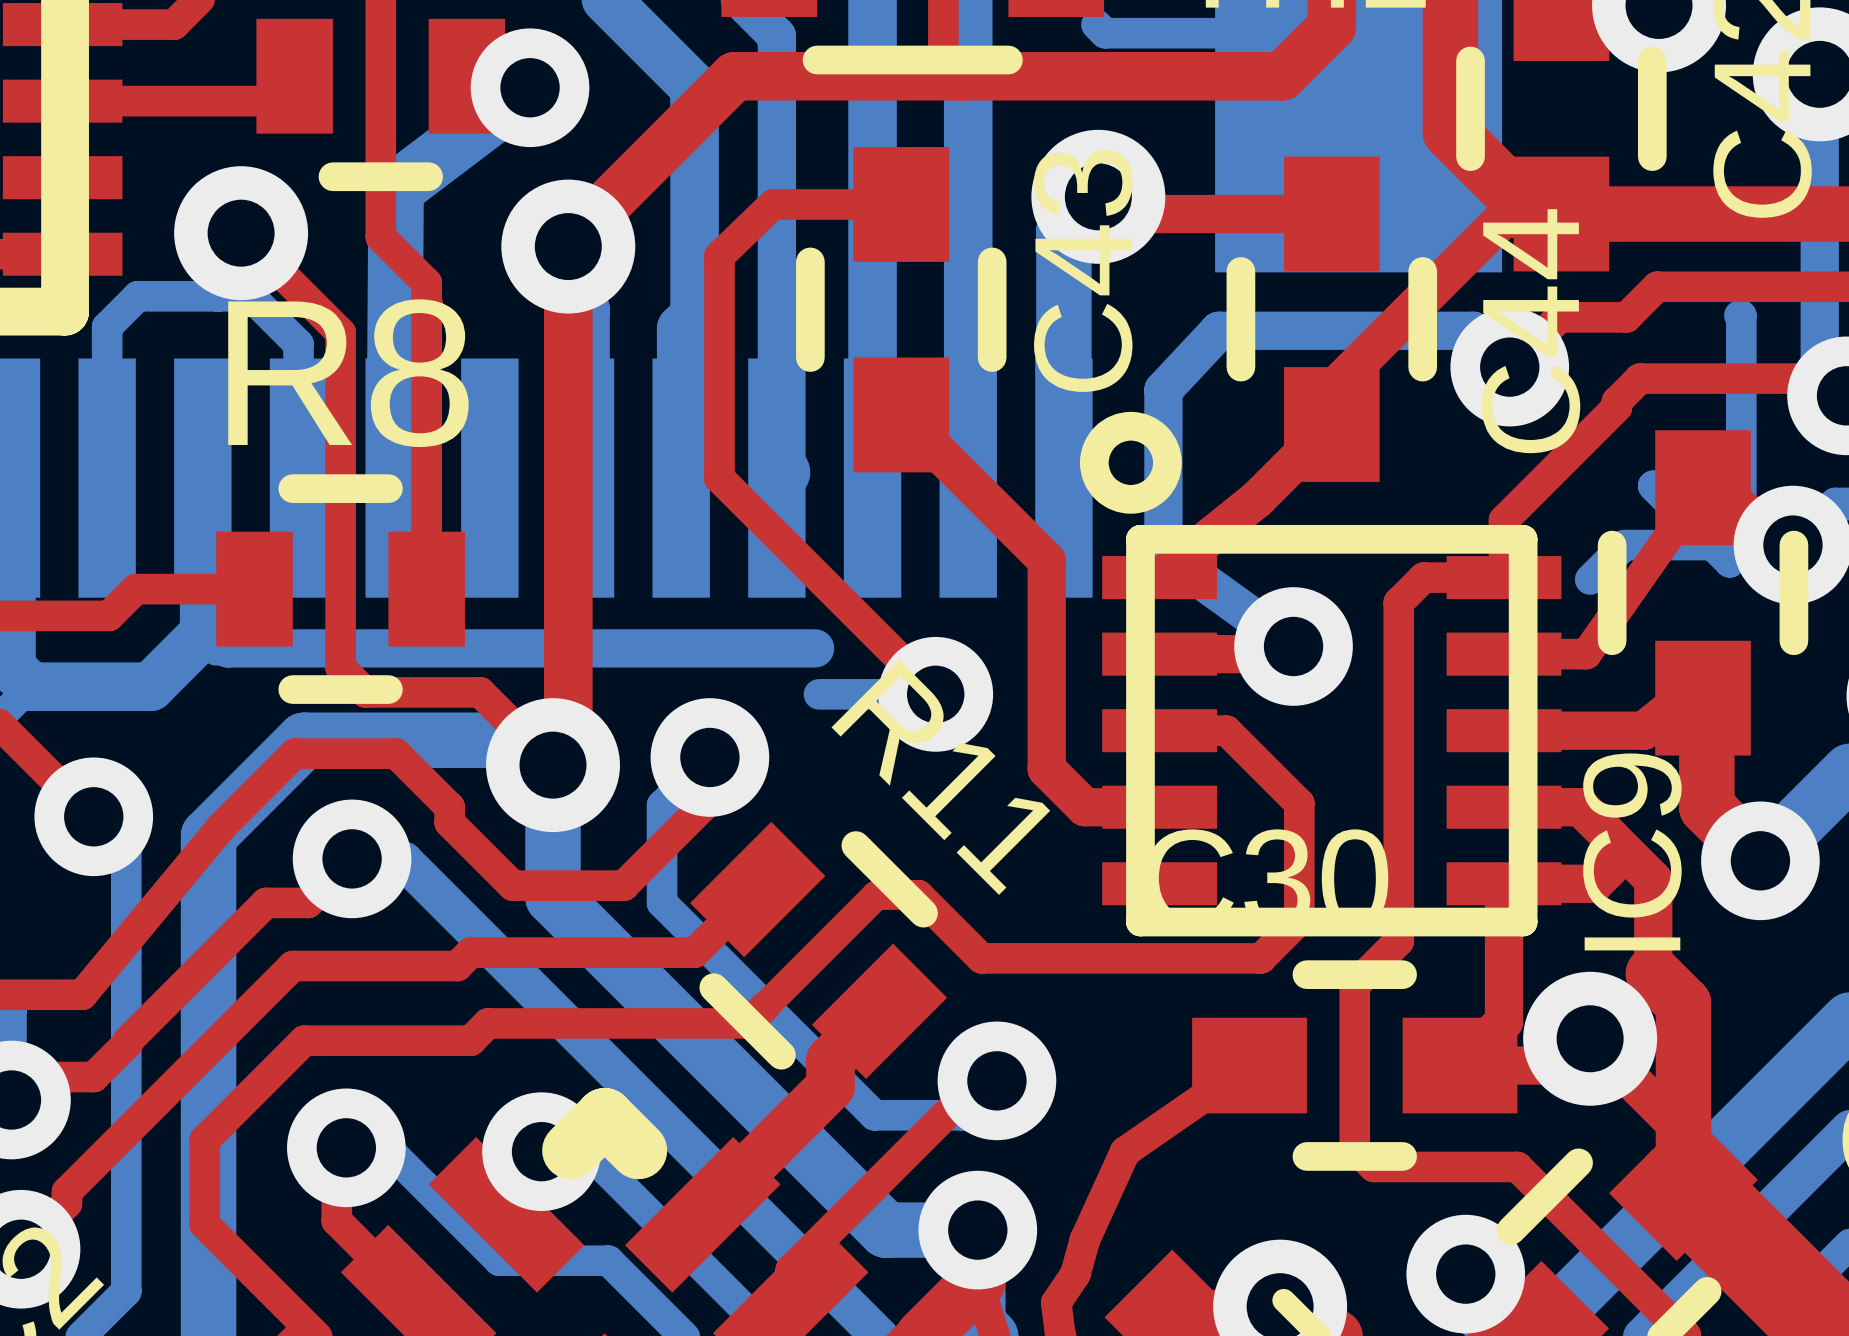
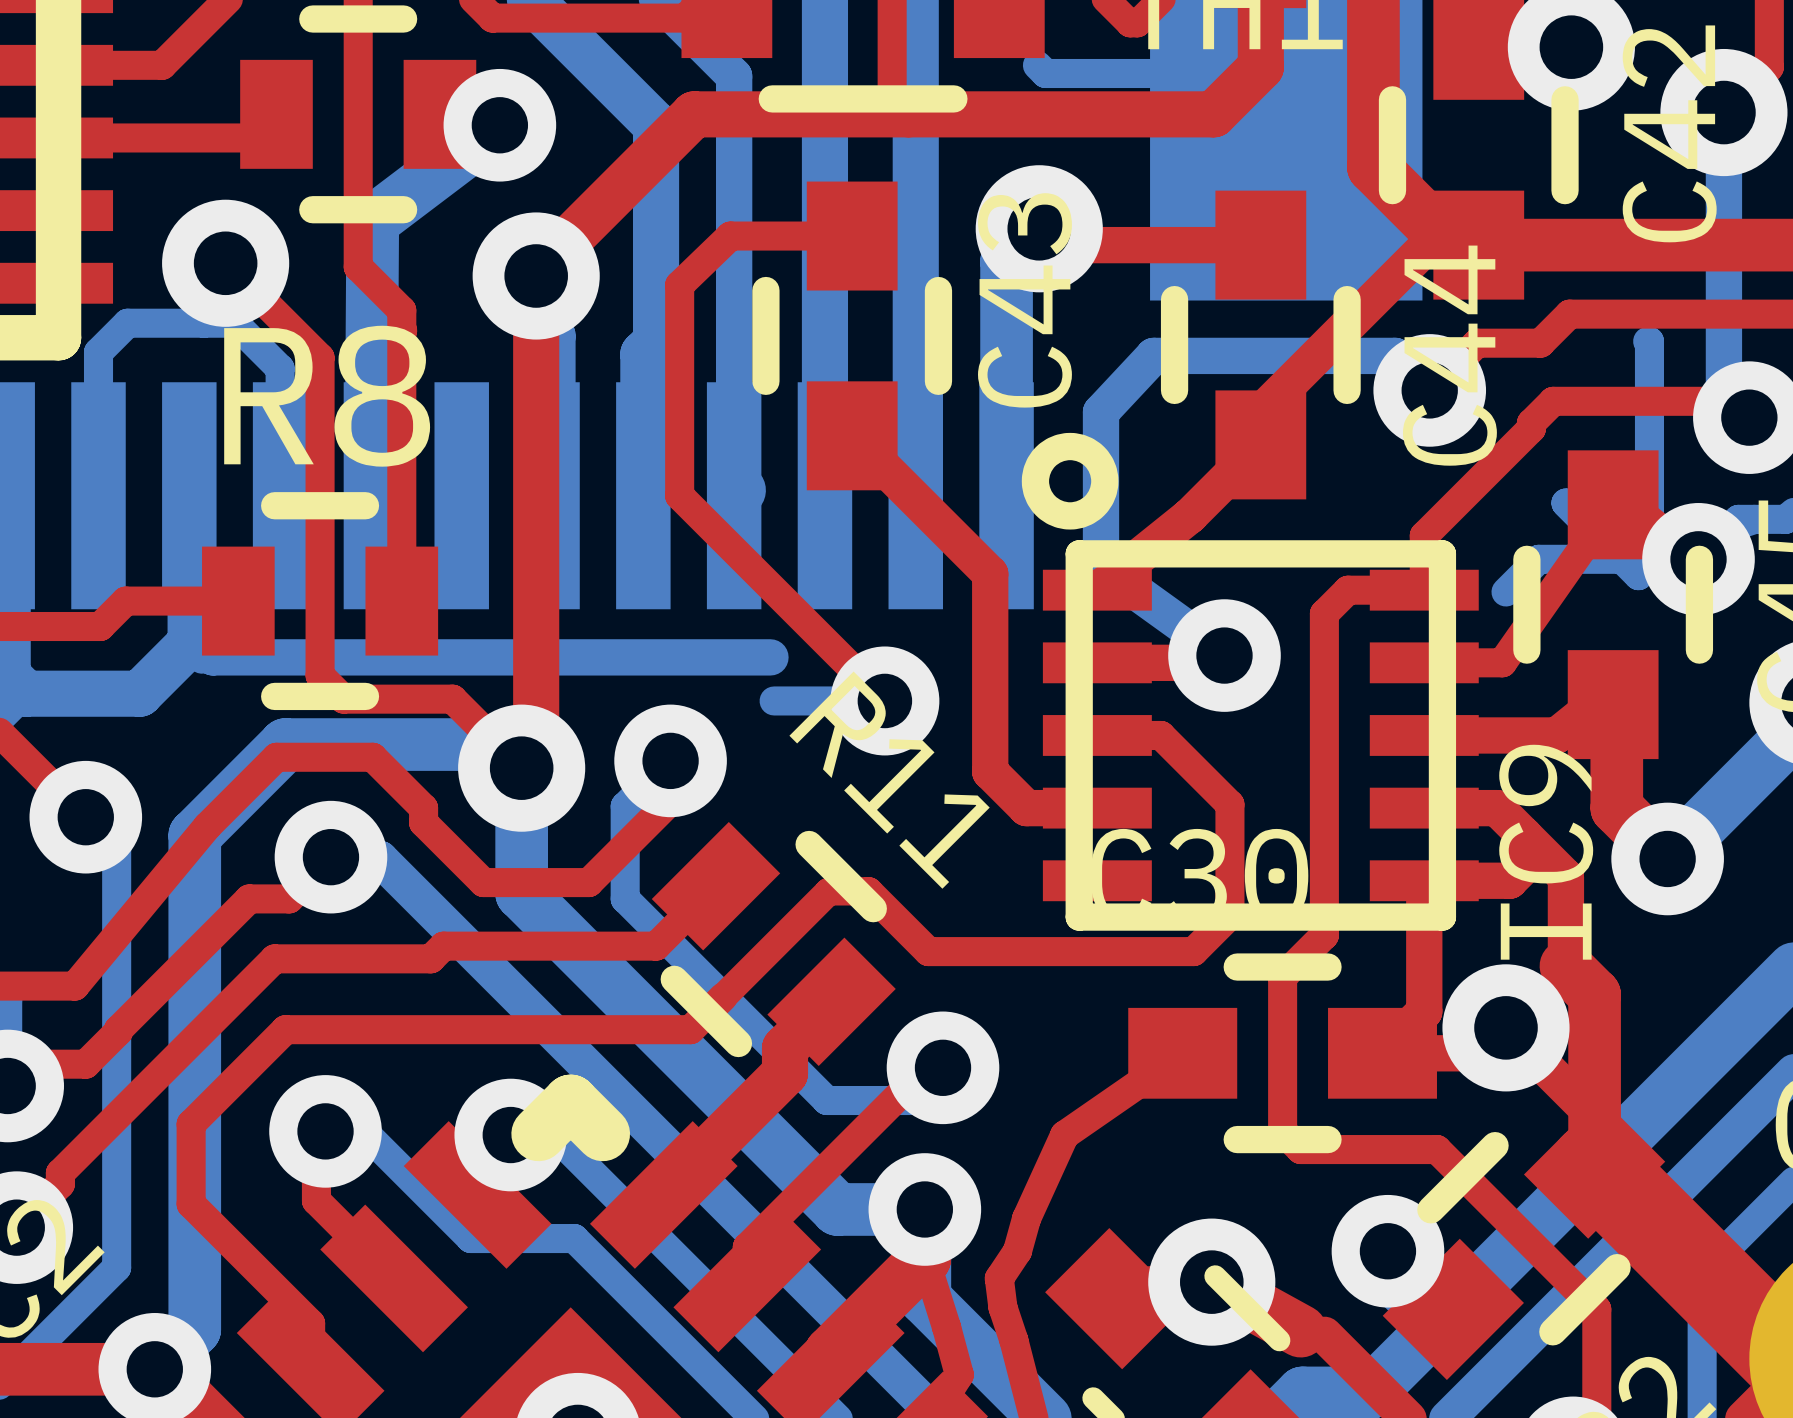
top track: (748, 1023) (487, 1023) (470, 1040) -> (706, 1013) (690, 1029) (443, 1029)

